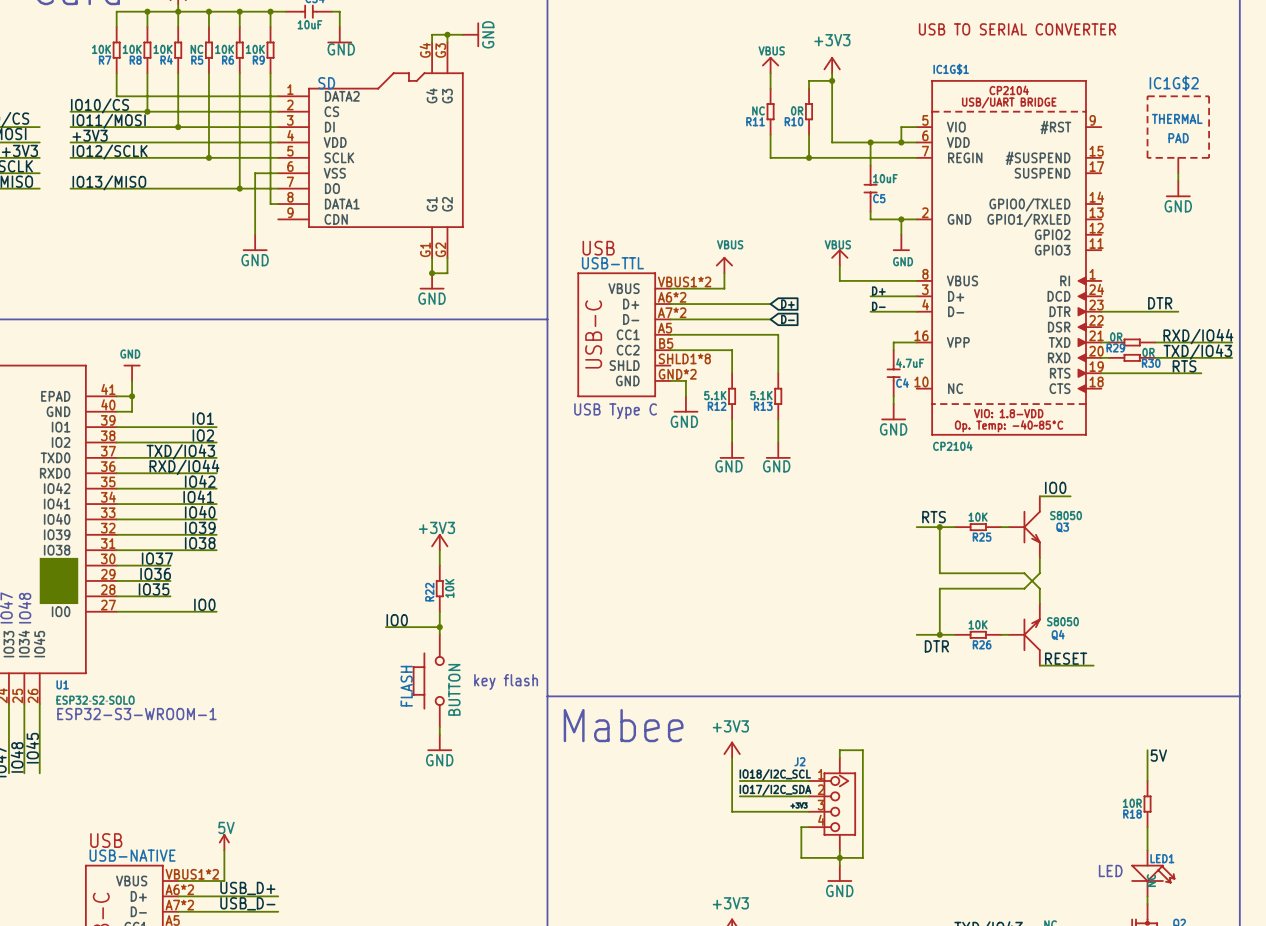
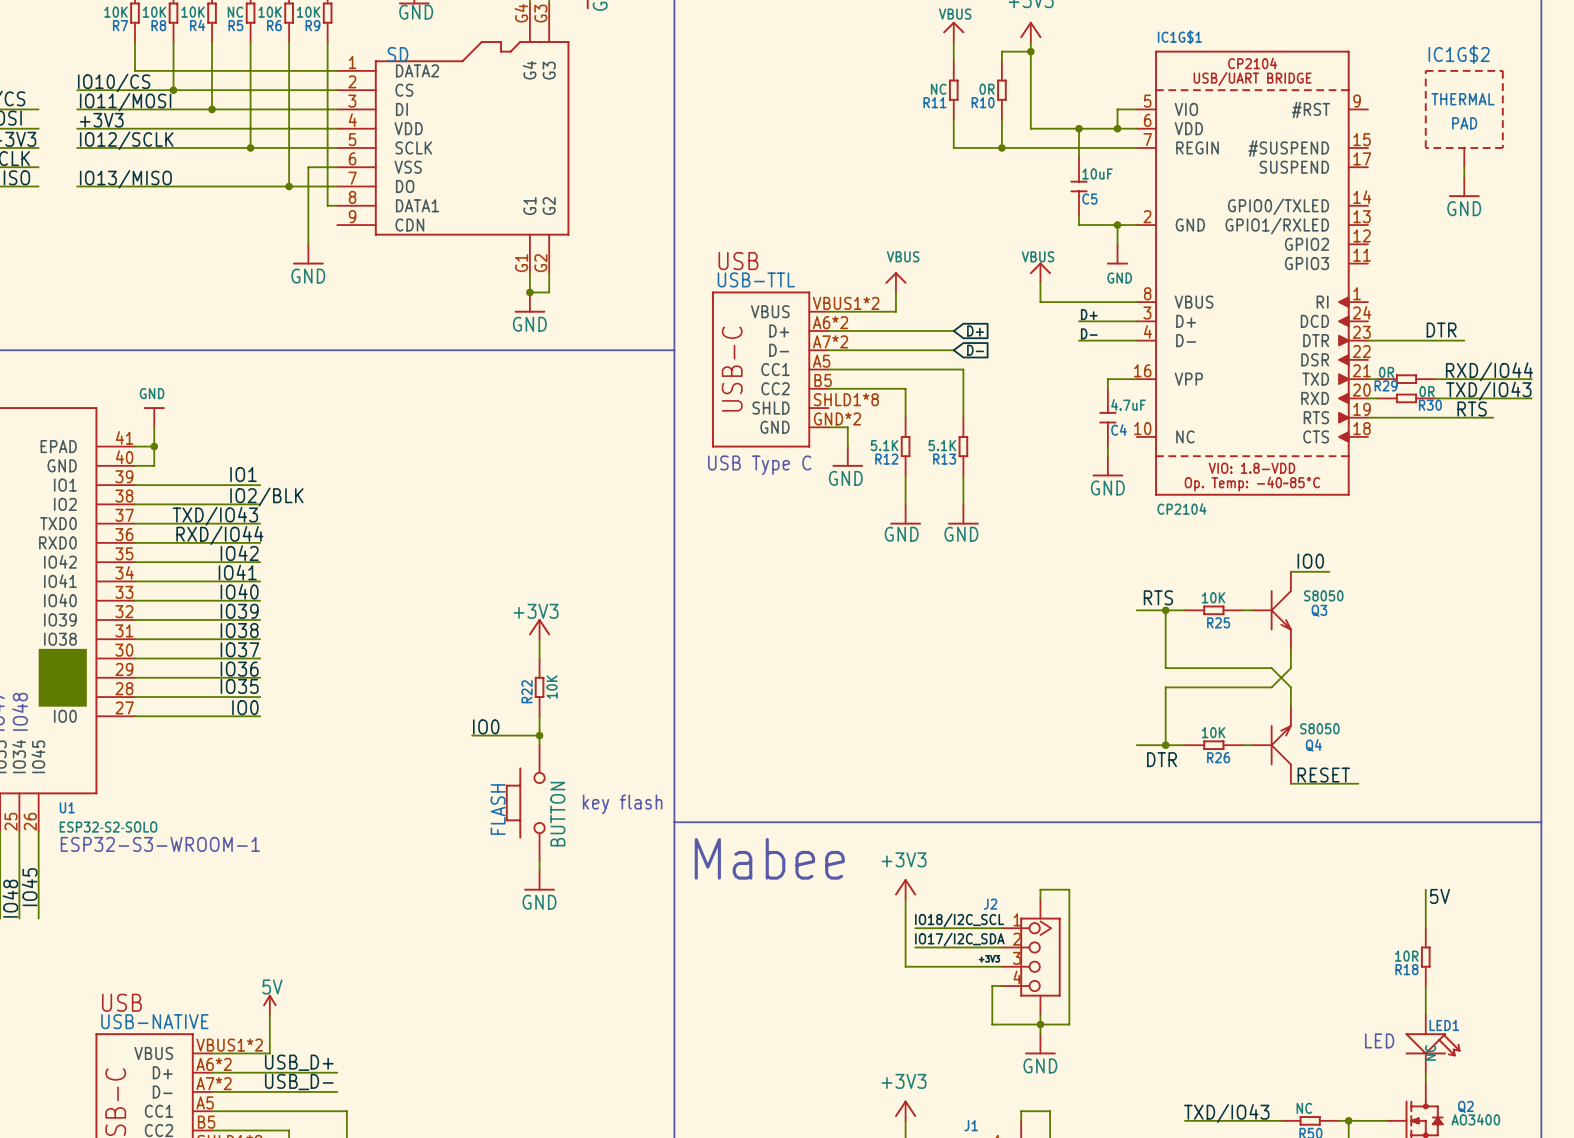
label: IO2 (203, 435) -> IO2/BLK (266, 496)
label position: IO37 (157, 558) -> IO37 (239, 649)
wire: none -> (202, 658) (260, 658)
label position: IO36 (155, 574) -> IO36 (239, 669)
wire: none -> (202, 677) (260, 677)
label position: IO35 (154, 589) -> IO35 (239, 686)
wire: none -> (202, 697) (260, 697)

